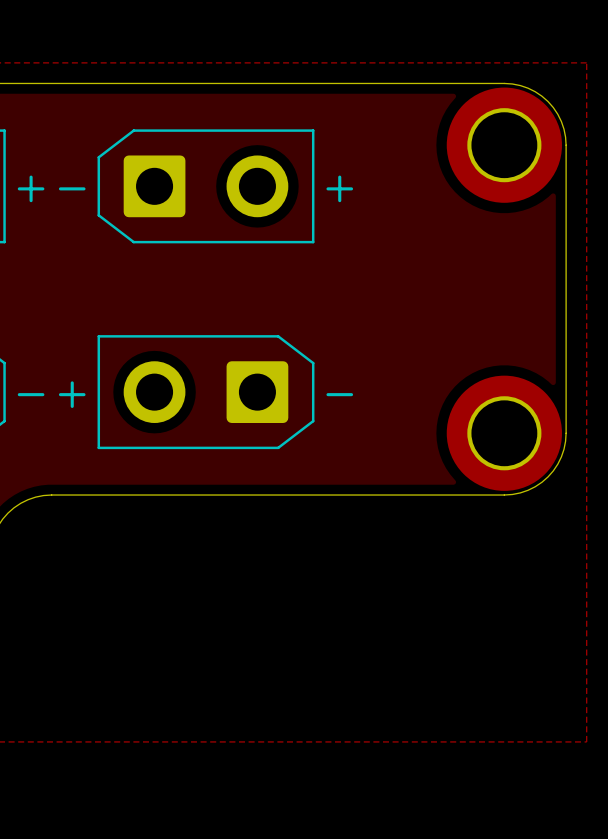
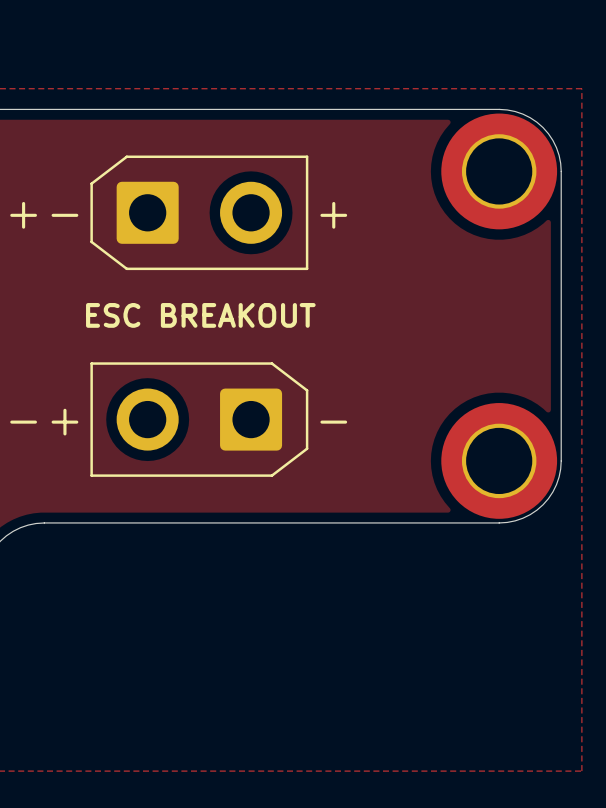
text: none -> ESC BREAKOUT (200, 315)

